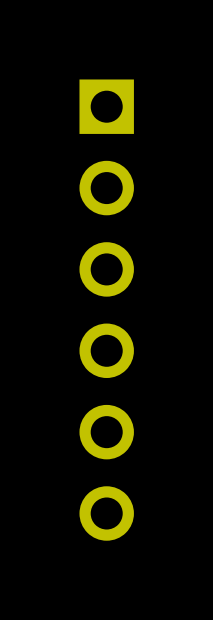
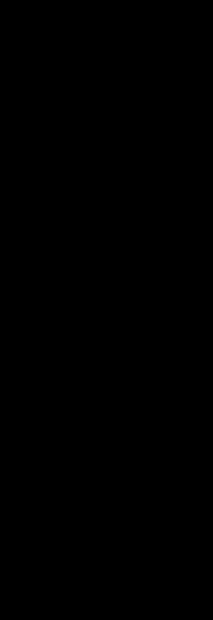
part: (106, 310) -> none

